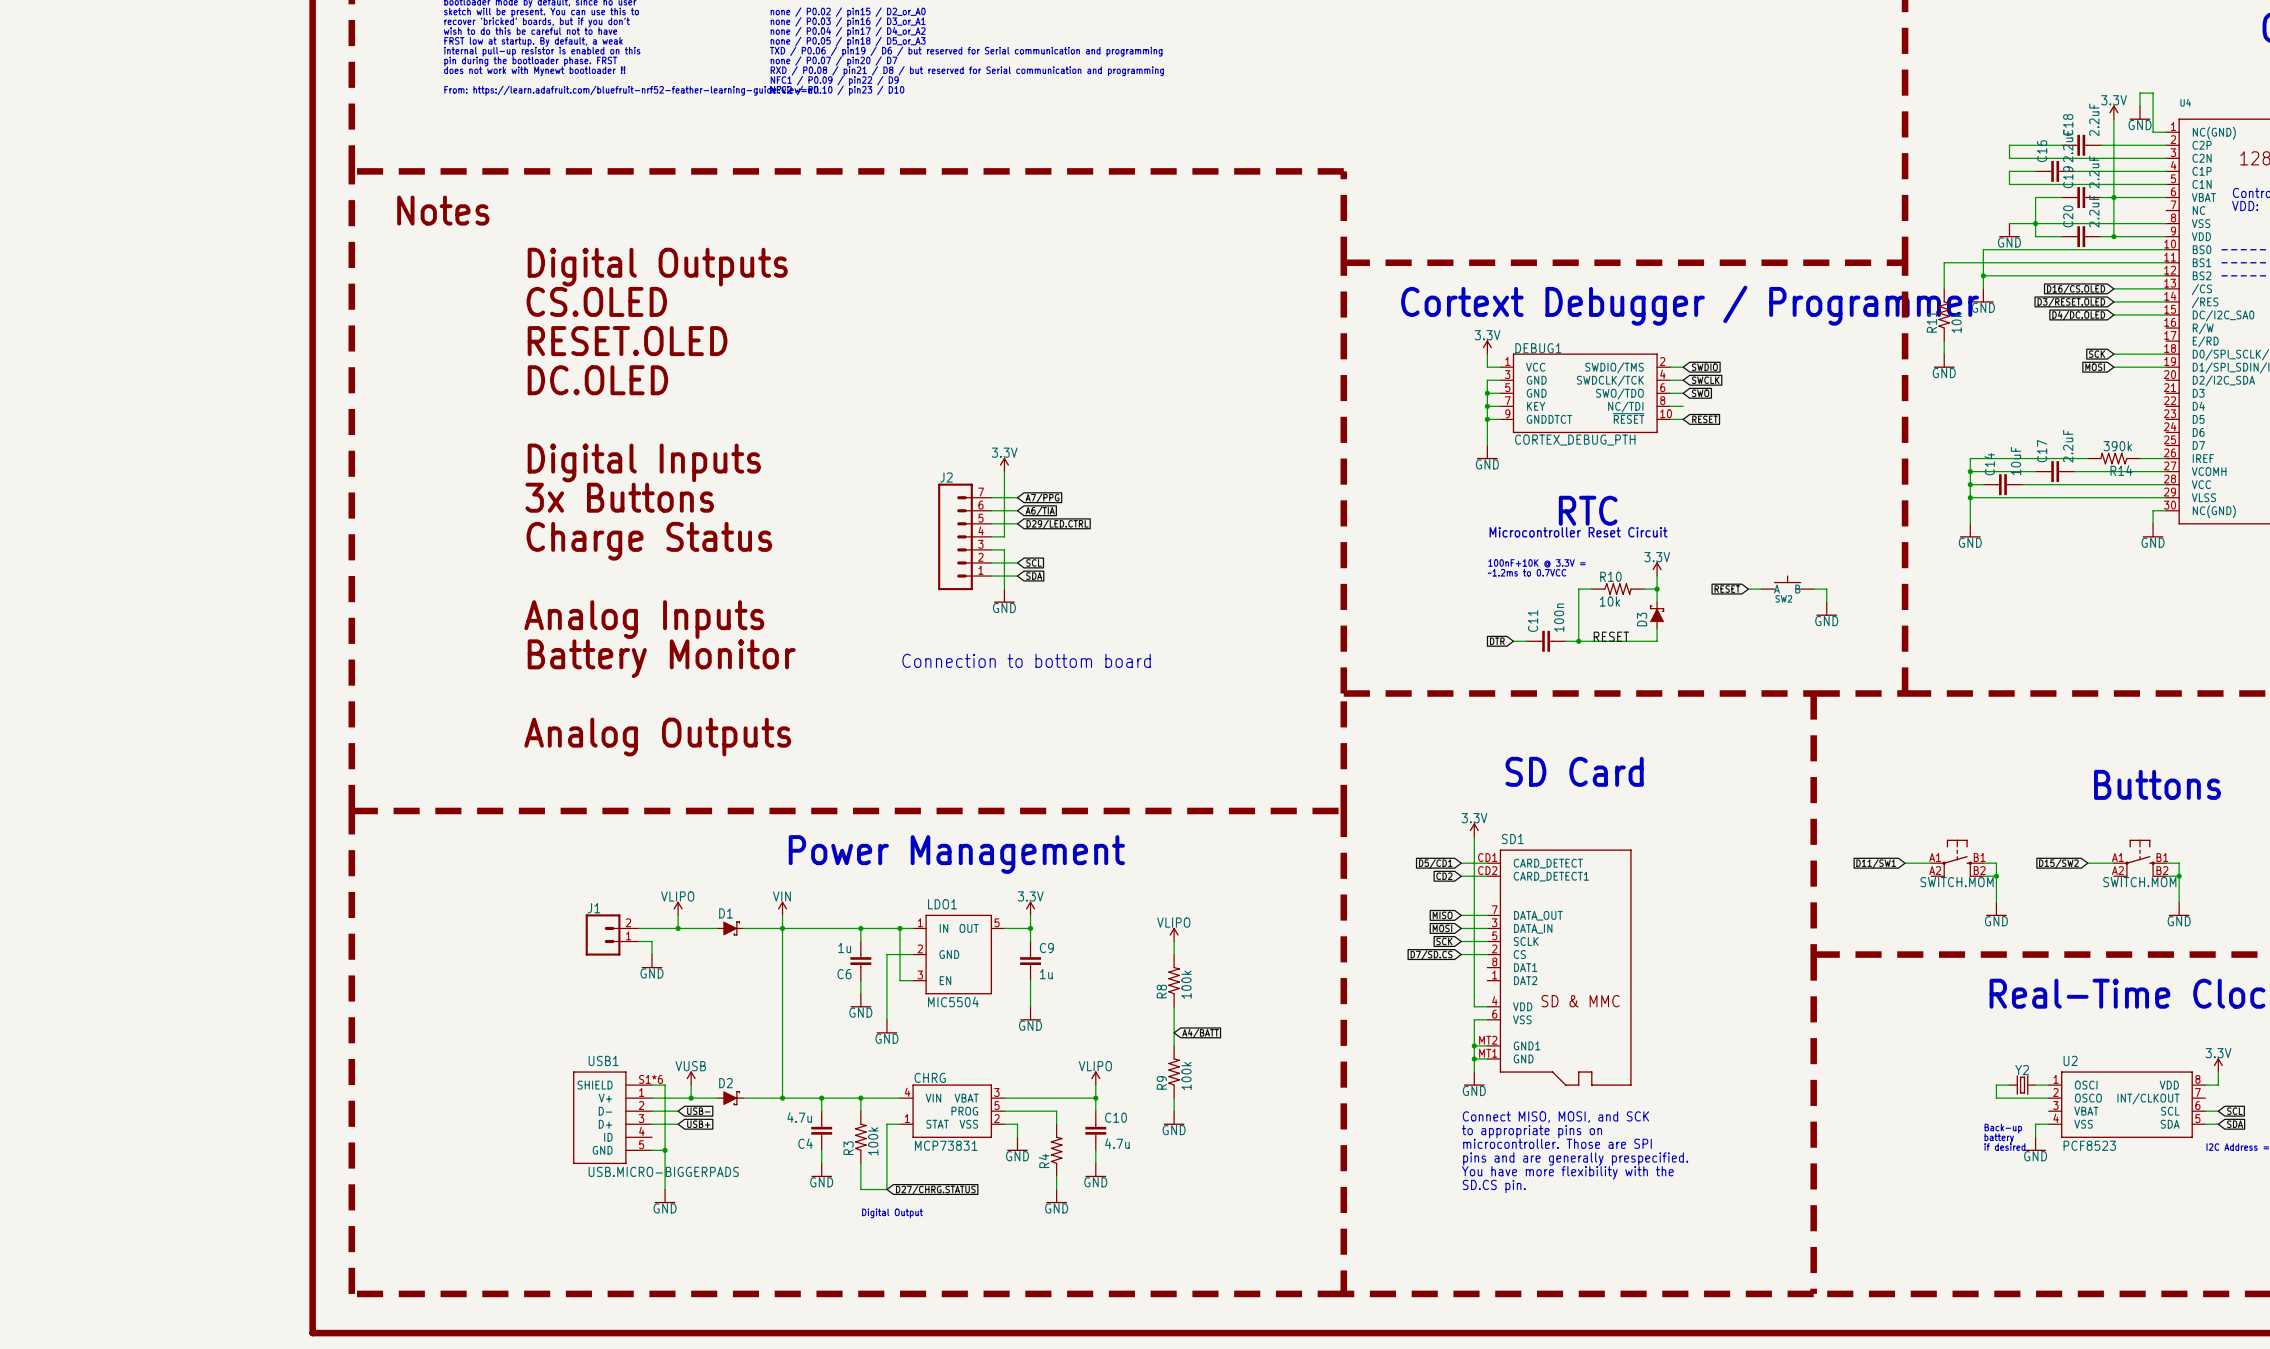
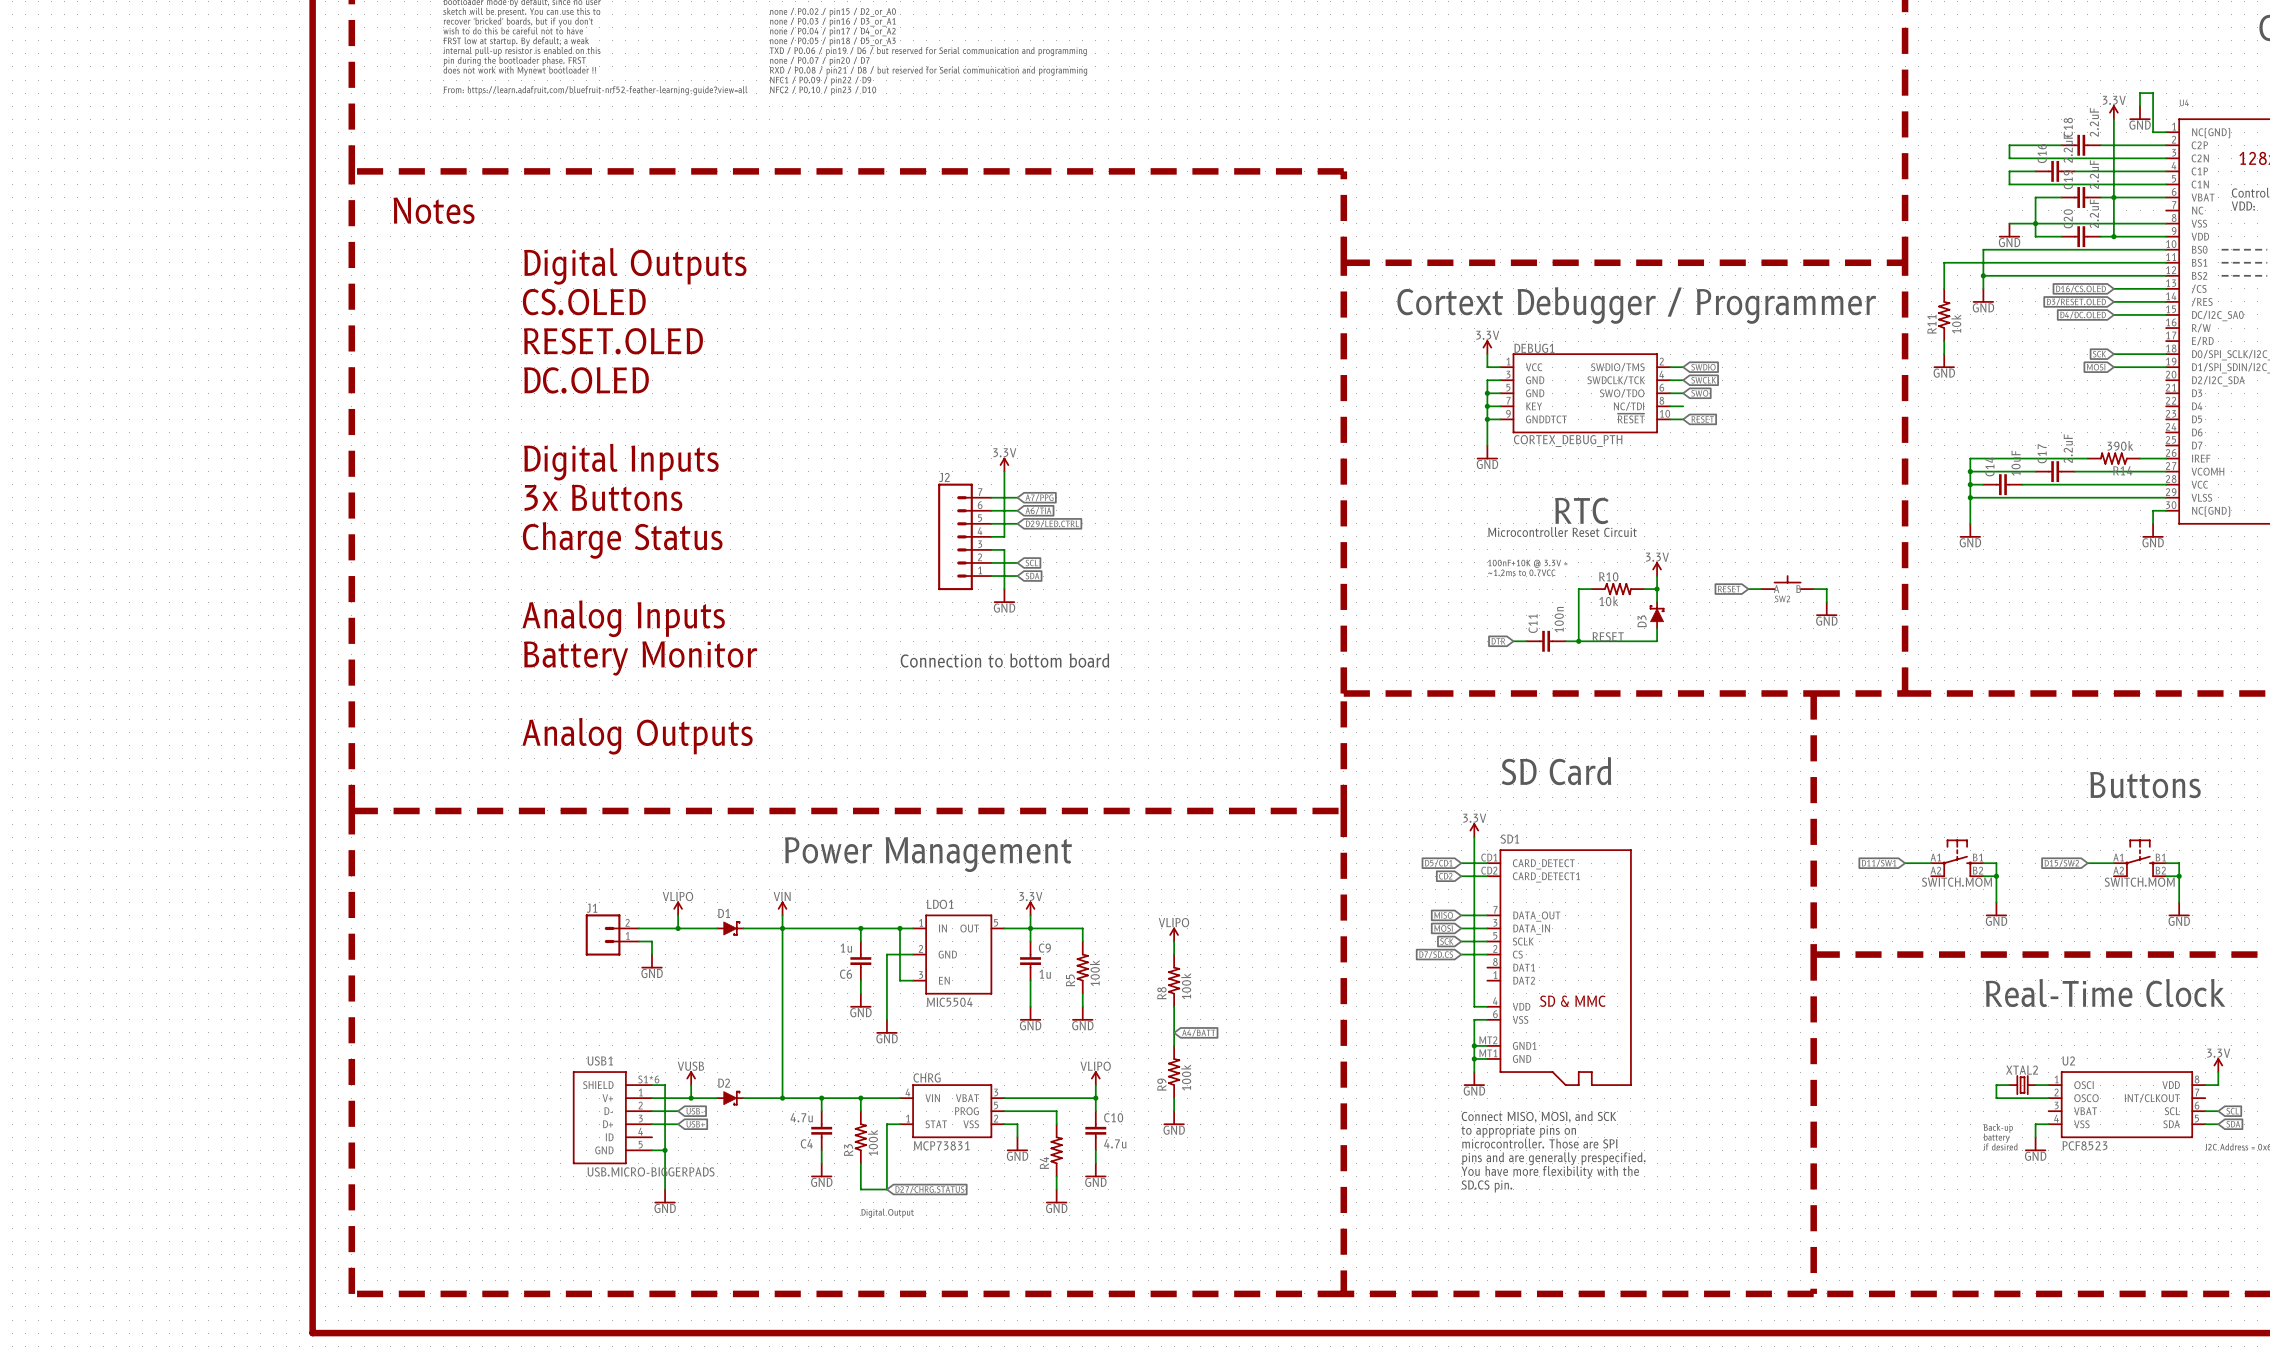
wire: none -> (1030, 928) (1082, 928) (1082, 941)
R5: none -> 100k (1082, 967)
wire: none -> (1082, 993) (1082, 1006)
power symbol: none -> GND (1082, 1013)
Y2 name: Y2 (2022, 1070) -> XTAL2 (2022, 1070)

